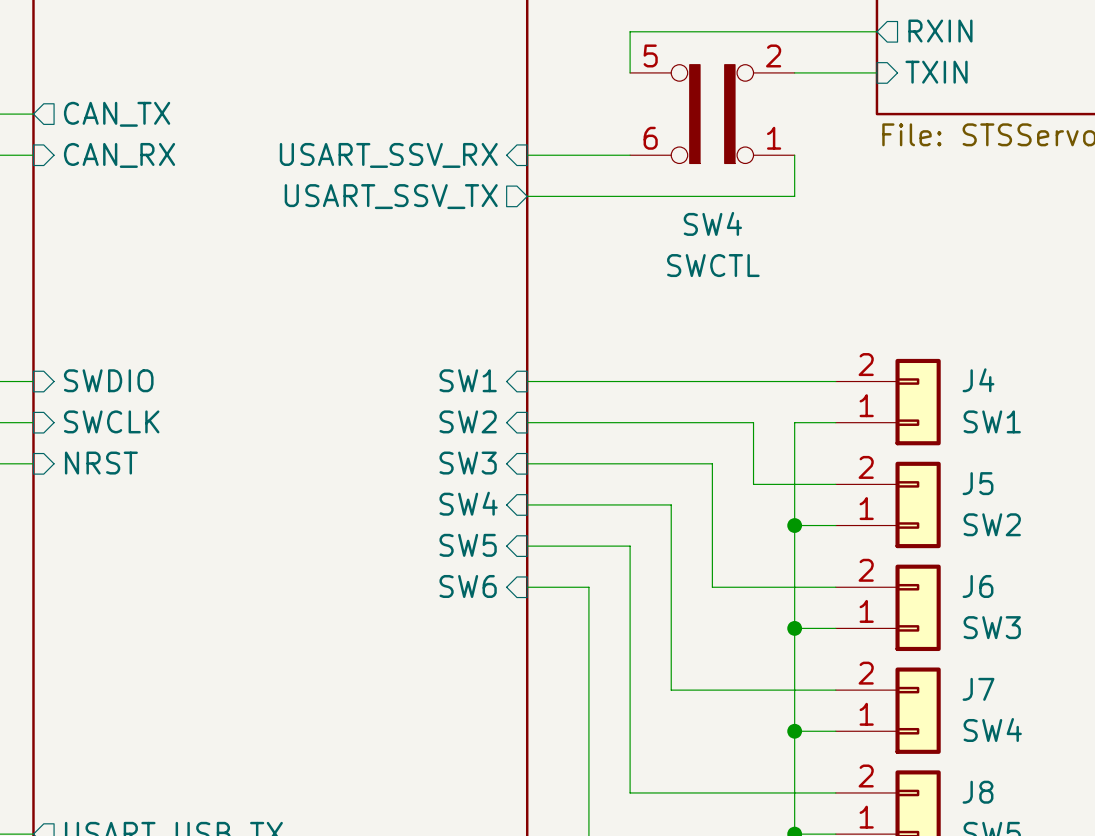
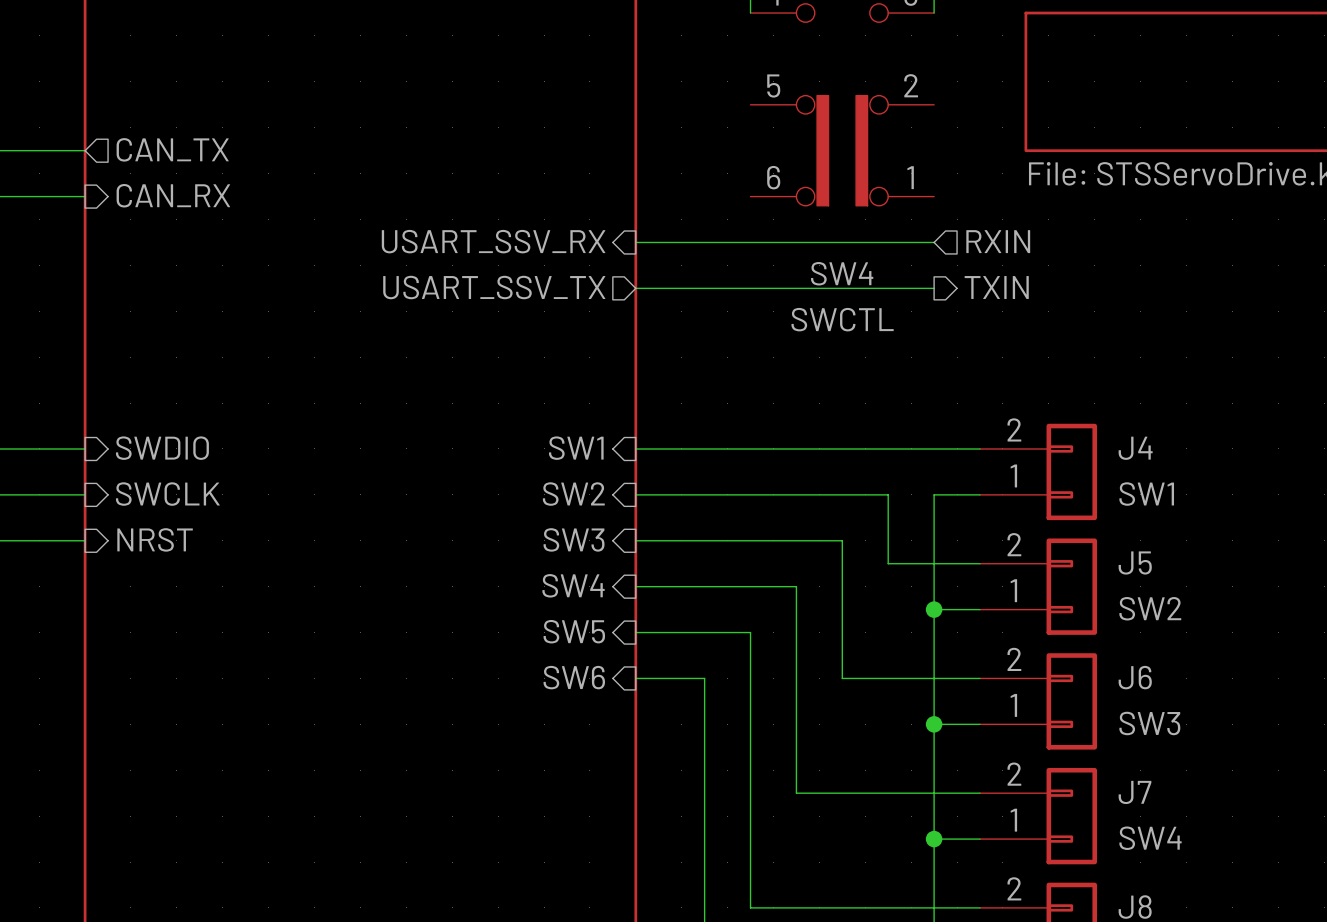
wire: (876, 31) (630, 31) (630, 72) -> none
sheet pin position: RXIN (940, 31) -> RXIN (998, 241)
wire: (794, 72) (876, 72) -> none
sheet pin position: TXIN (936, 72) -> TXIN (996, 287)
sheet pin: USART_SSV_RX (388, 155) -> none
wire: (527, 155) (630, 155) -> none
wire: (794, 155) (794, 196) -> none
sheet pin shape: output (391, 196) -> input (493, 241)
sheet pin: USART_SSV_TX (391, 196) -> USART_SSV_RX (493, 241)
sheet pin: none -> USART_SSV_TX (494, 287)
wire: none -> (635, 288) (934, 288)

